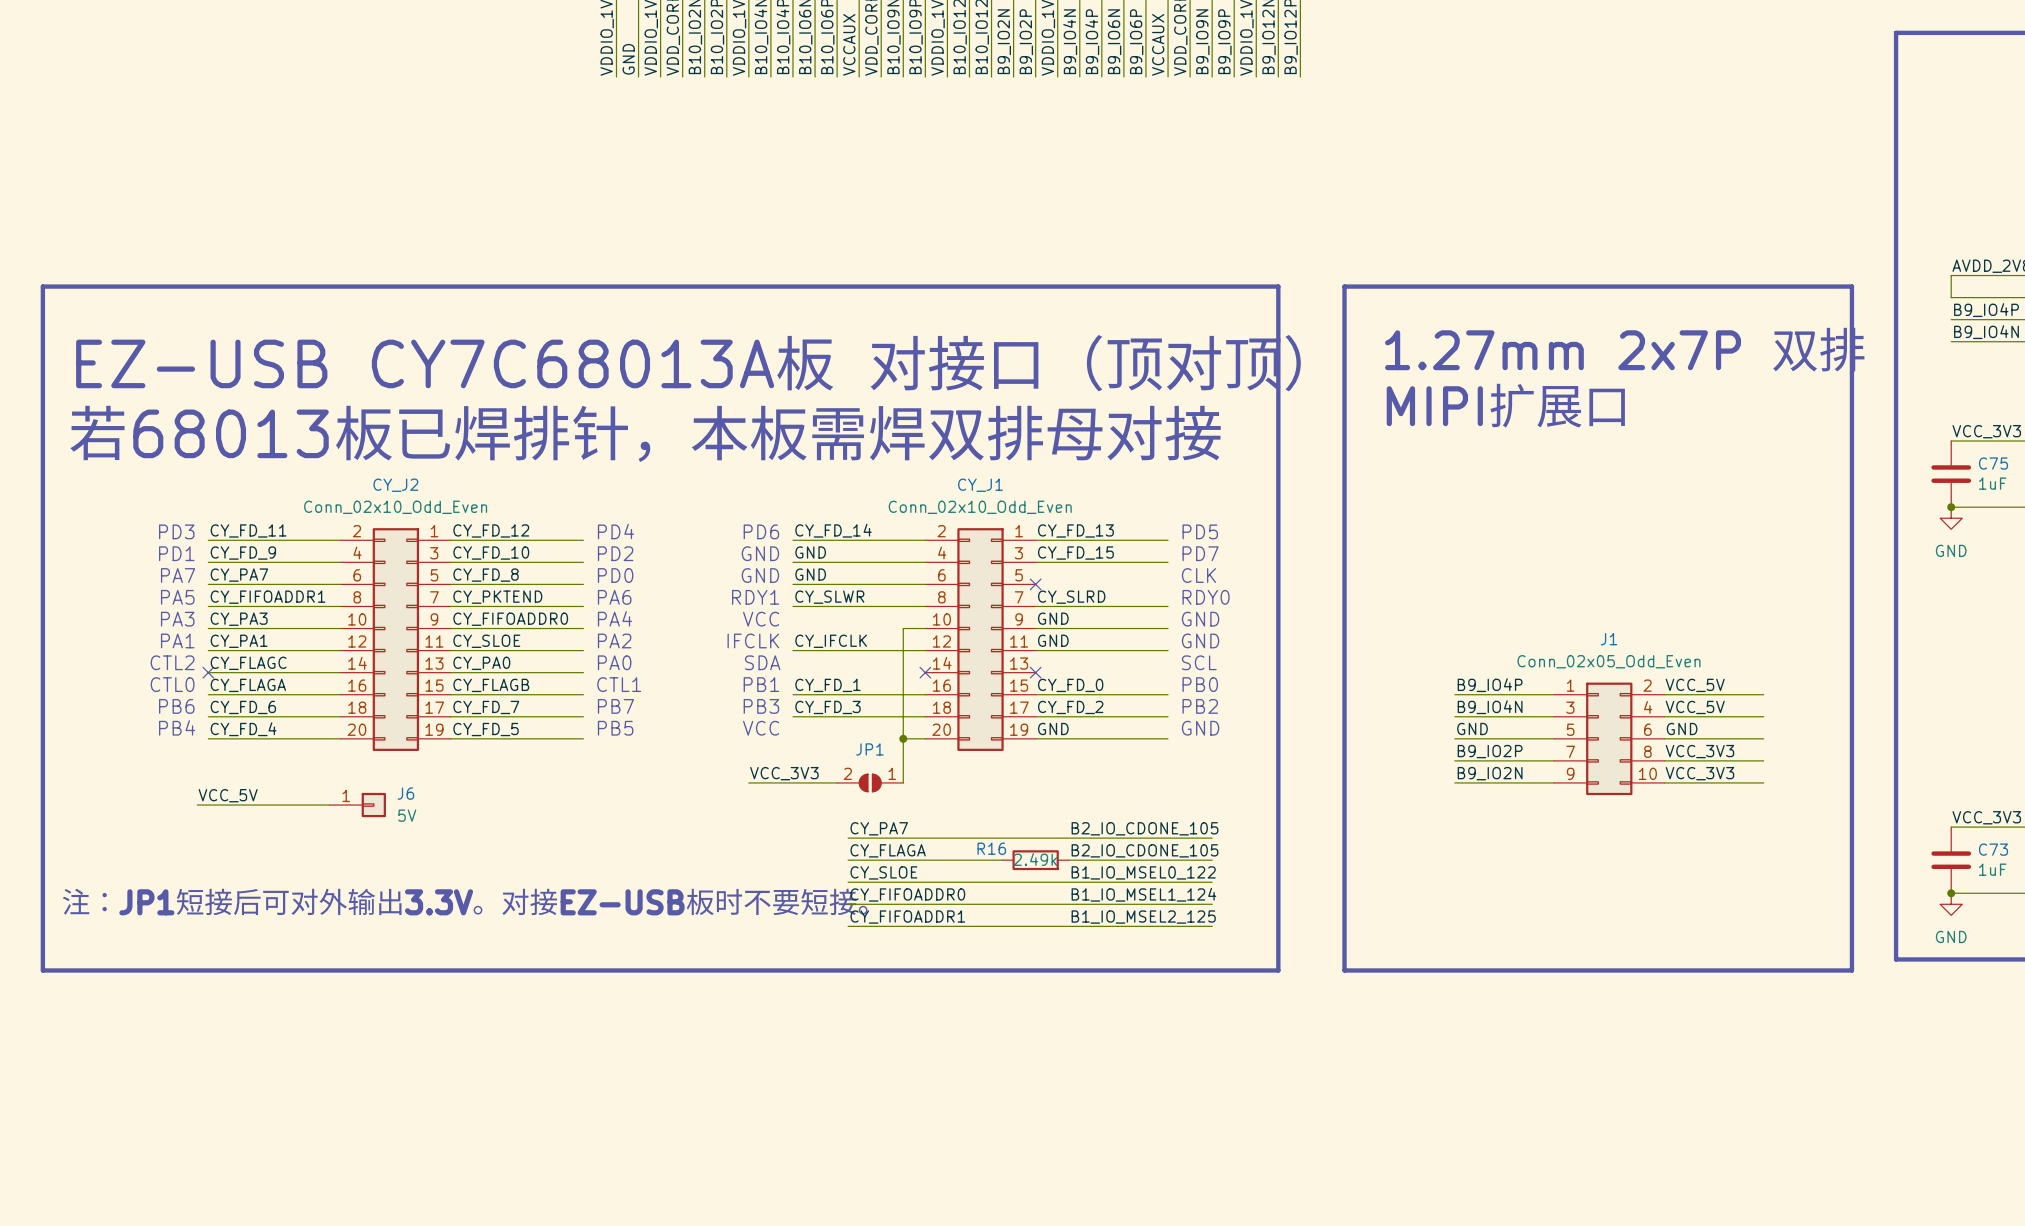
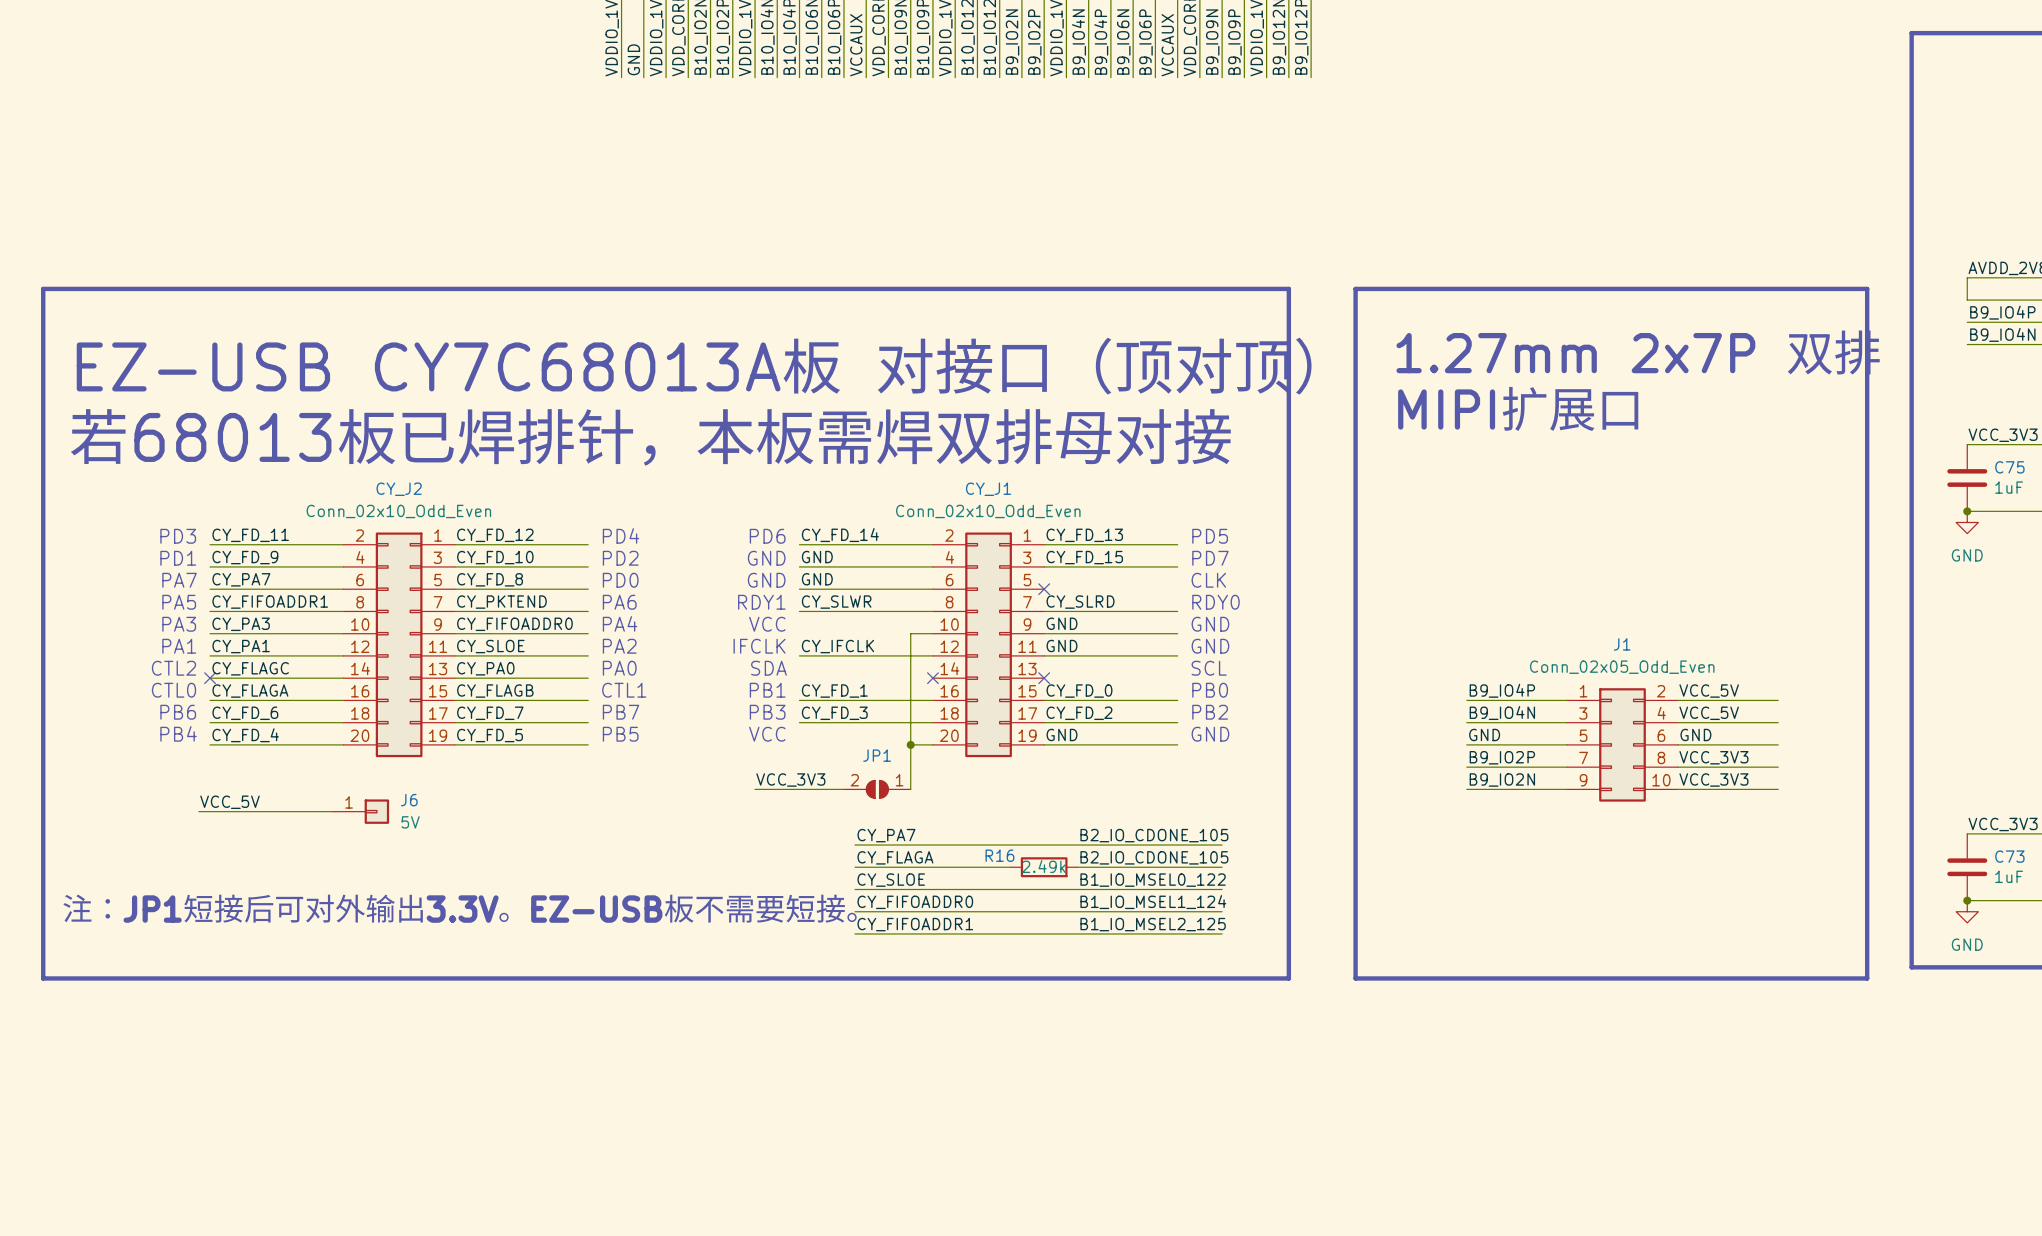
text: 注：JP1短接后可对外输出3.3V。对接EZ-USB板时不要短接。 (465, 901) -> 注：JP1短接后可对外输出3.3V。EZ-USB板不需要短接。 (460, 908)

